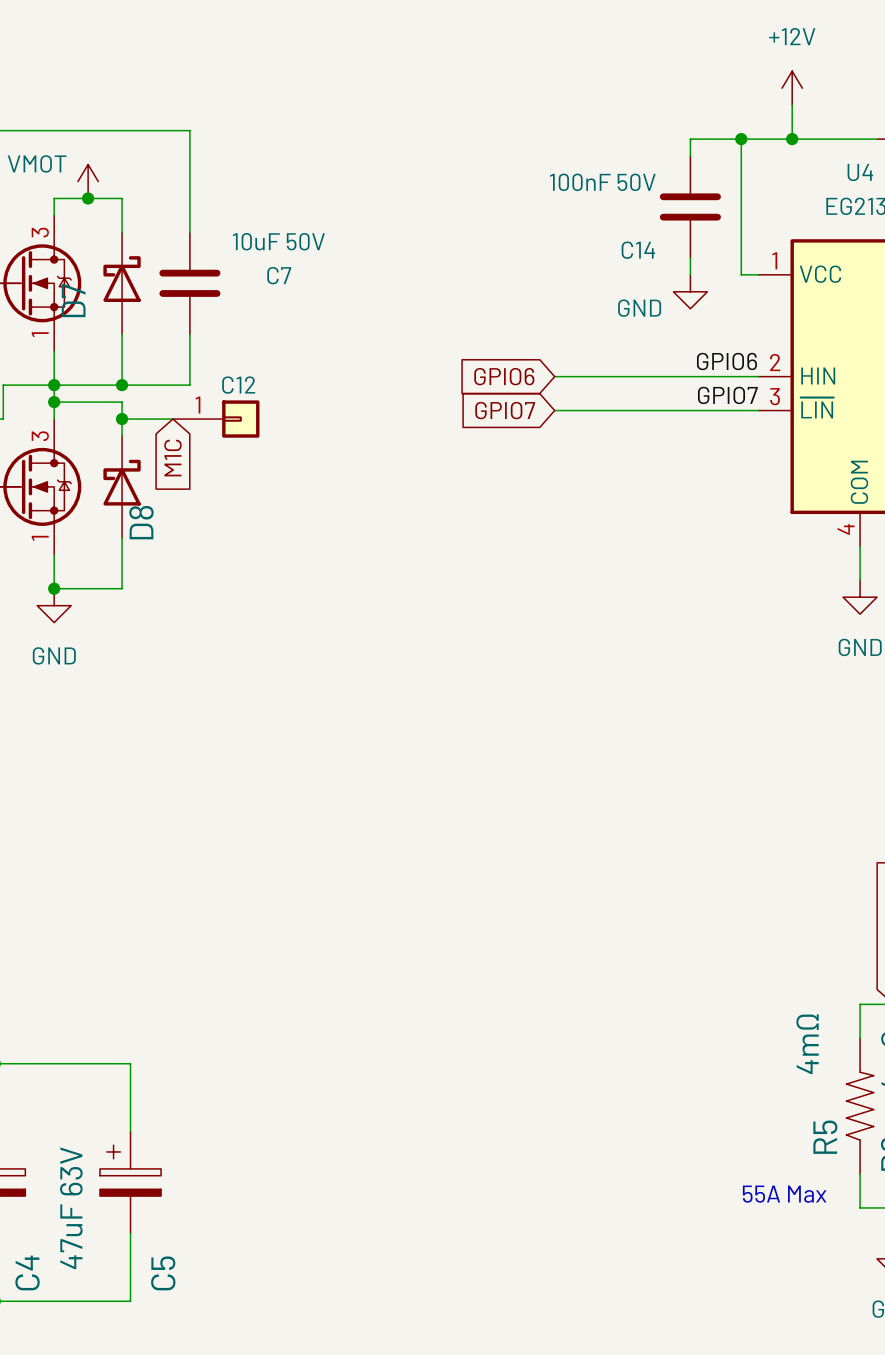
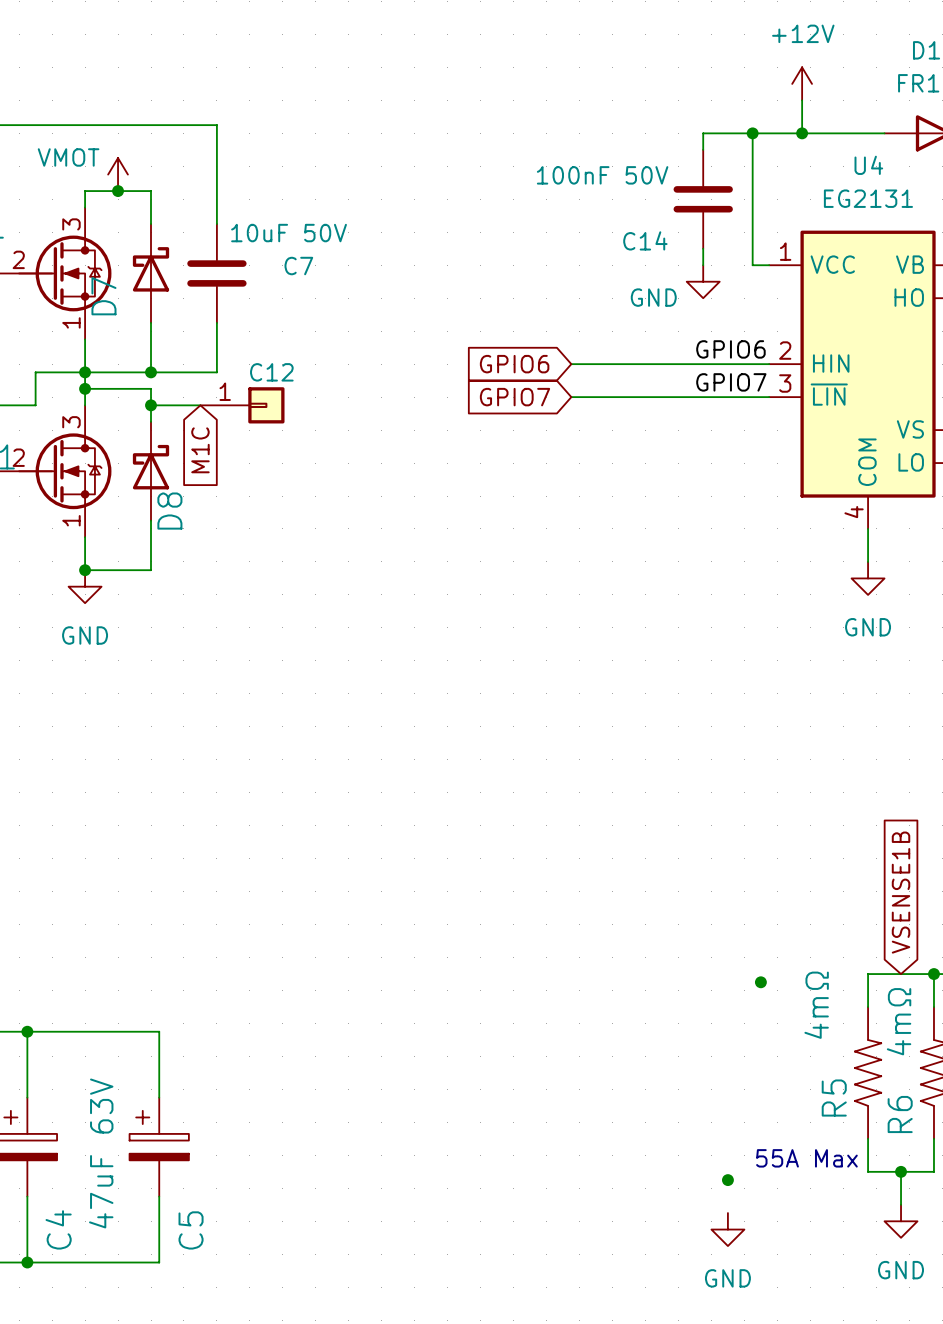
junction: none -> (760, 982)
junction: none -> (727, 1180)
power symbol: none -> GND (727, 1229)

